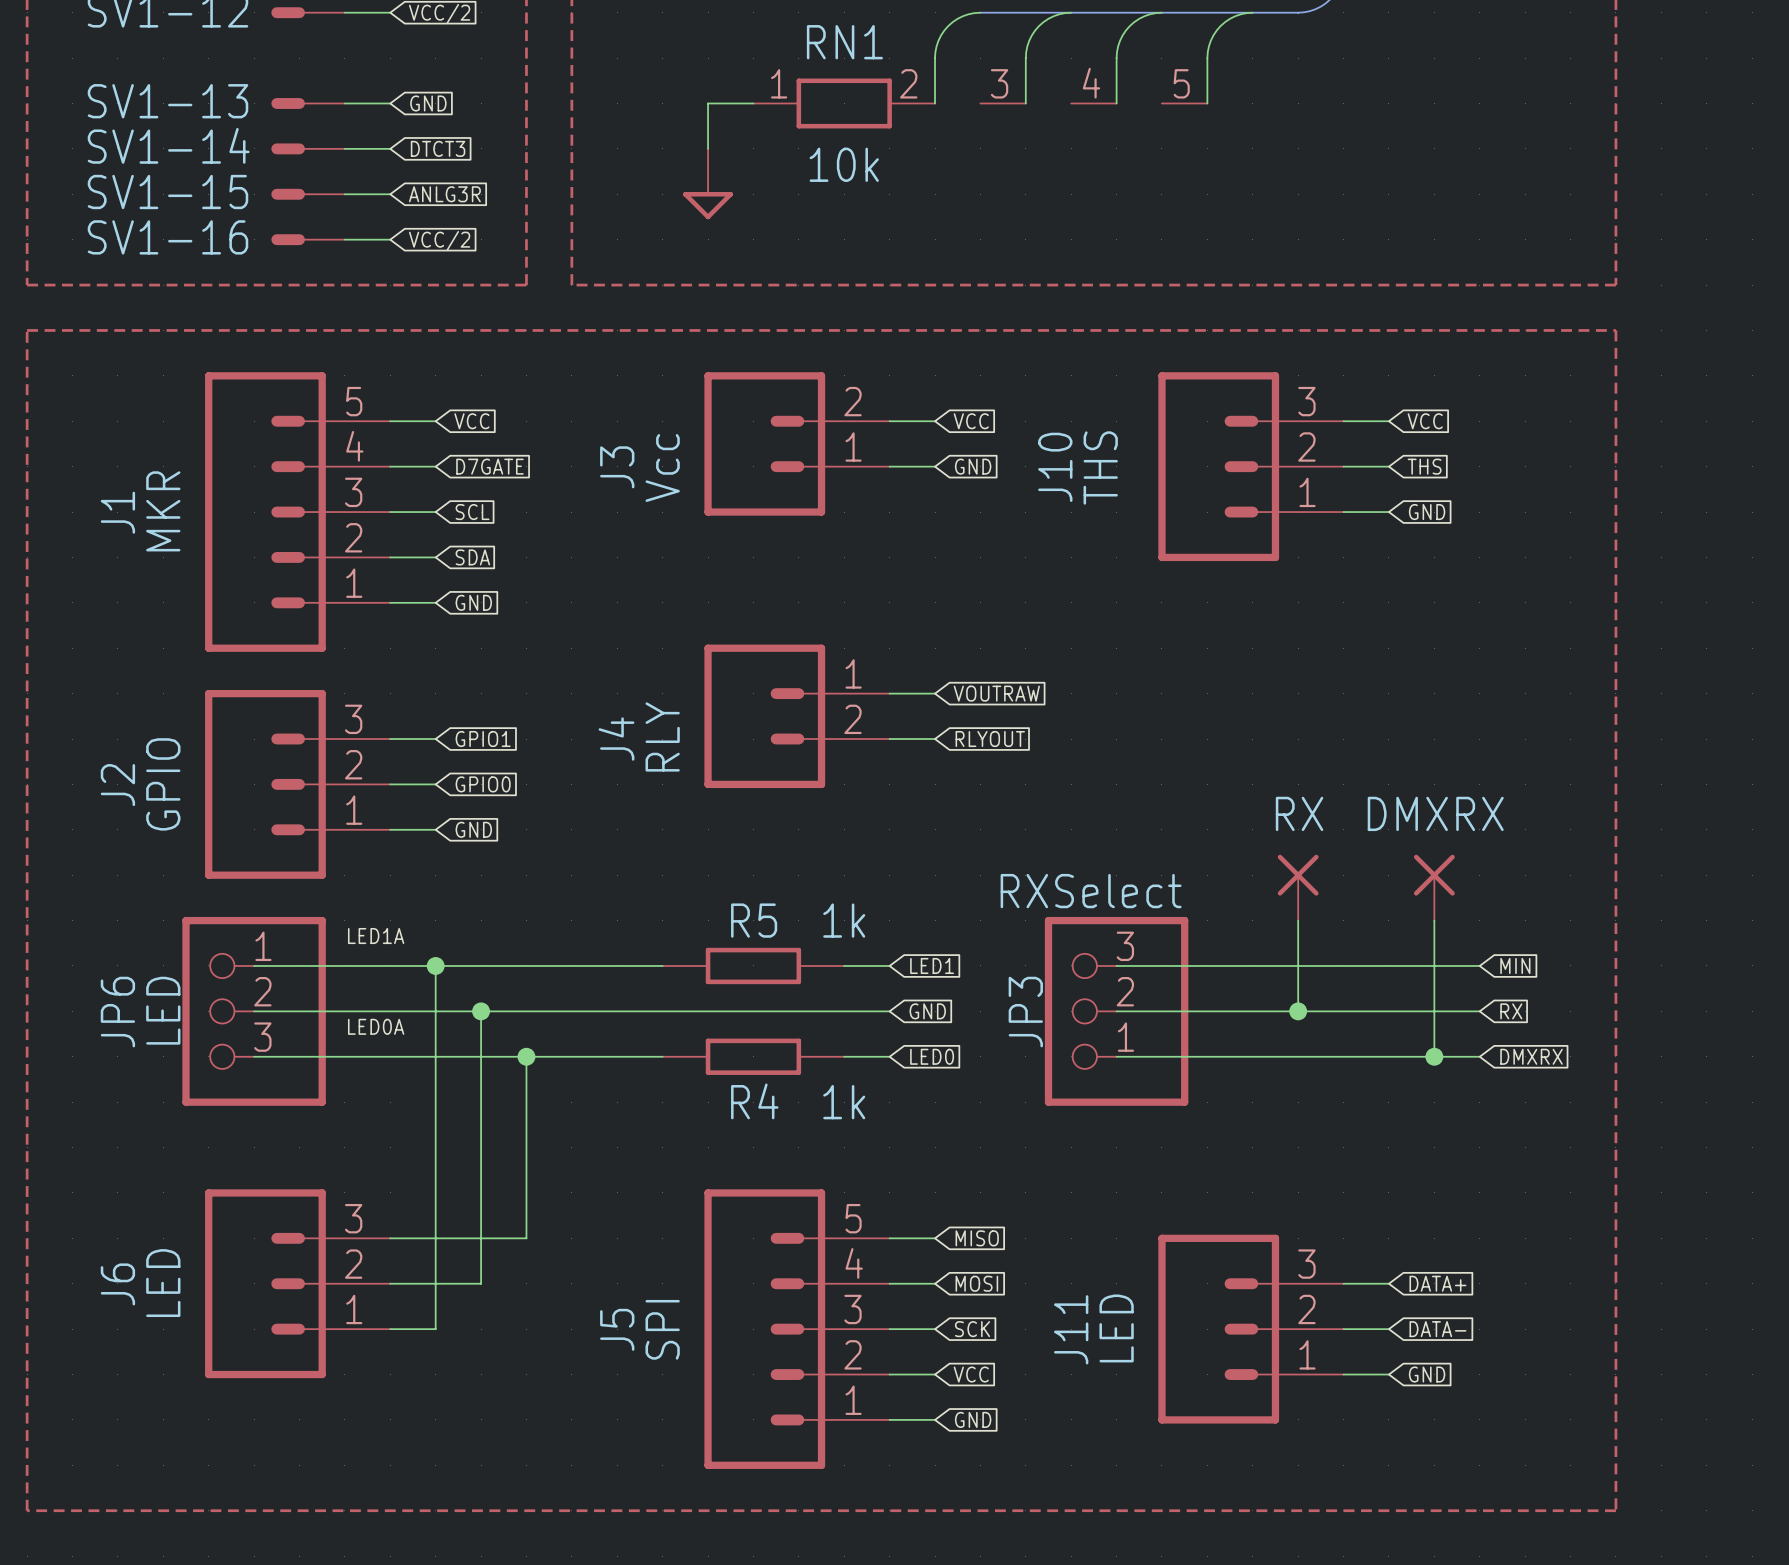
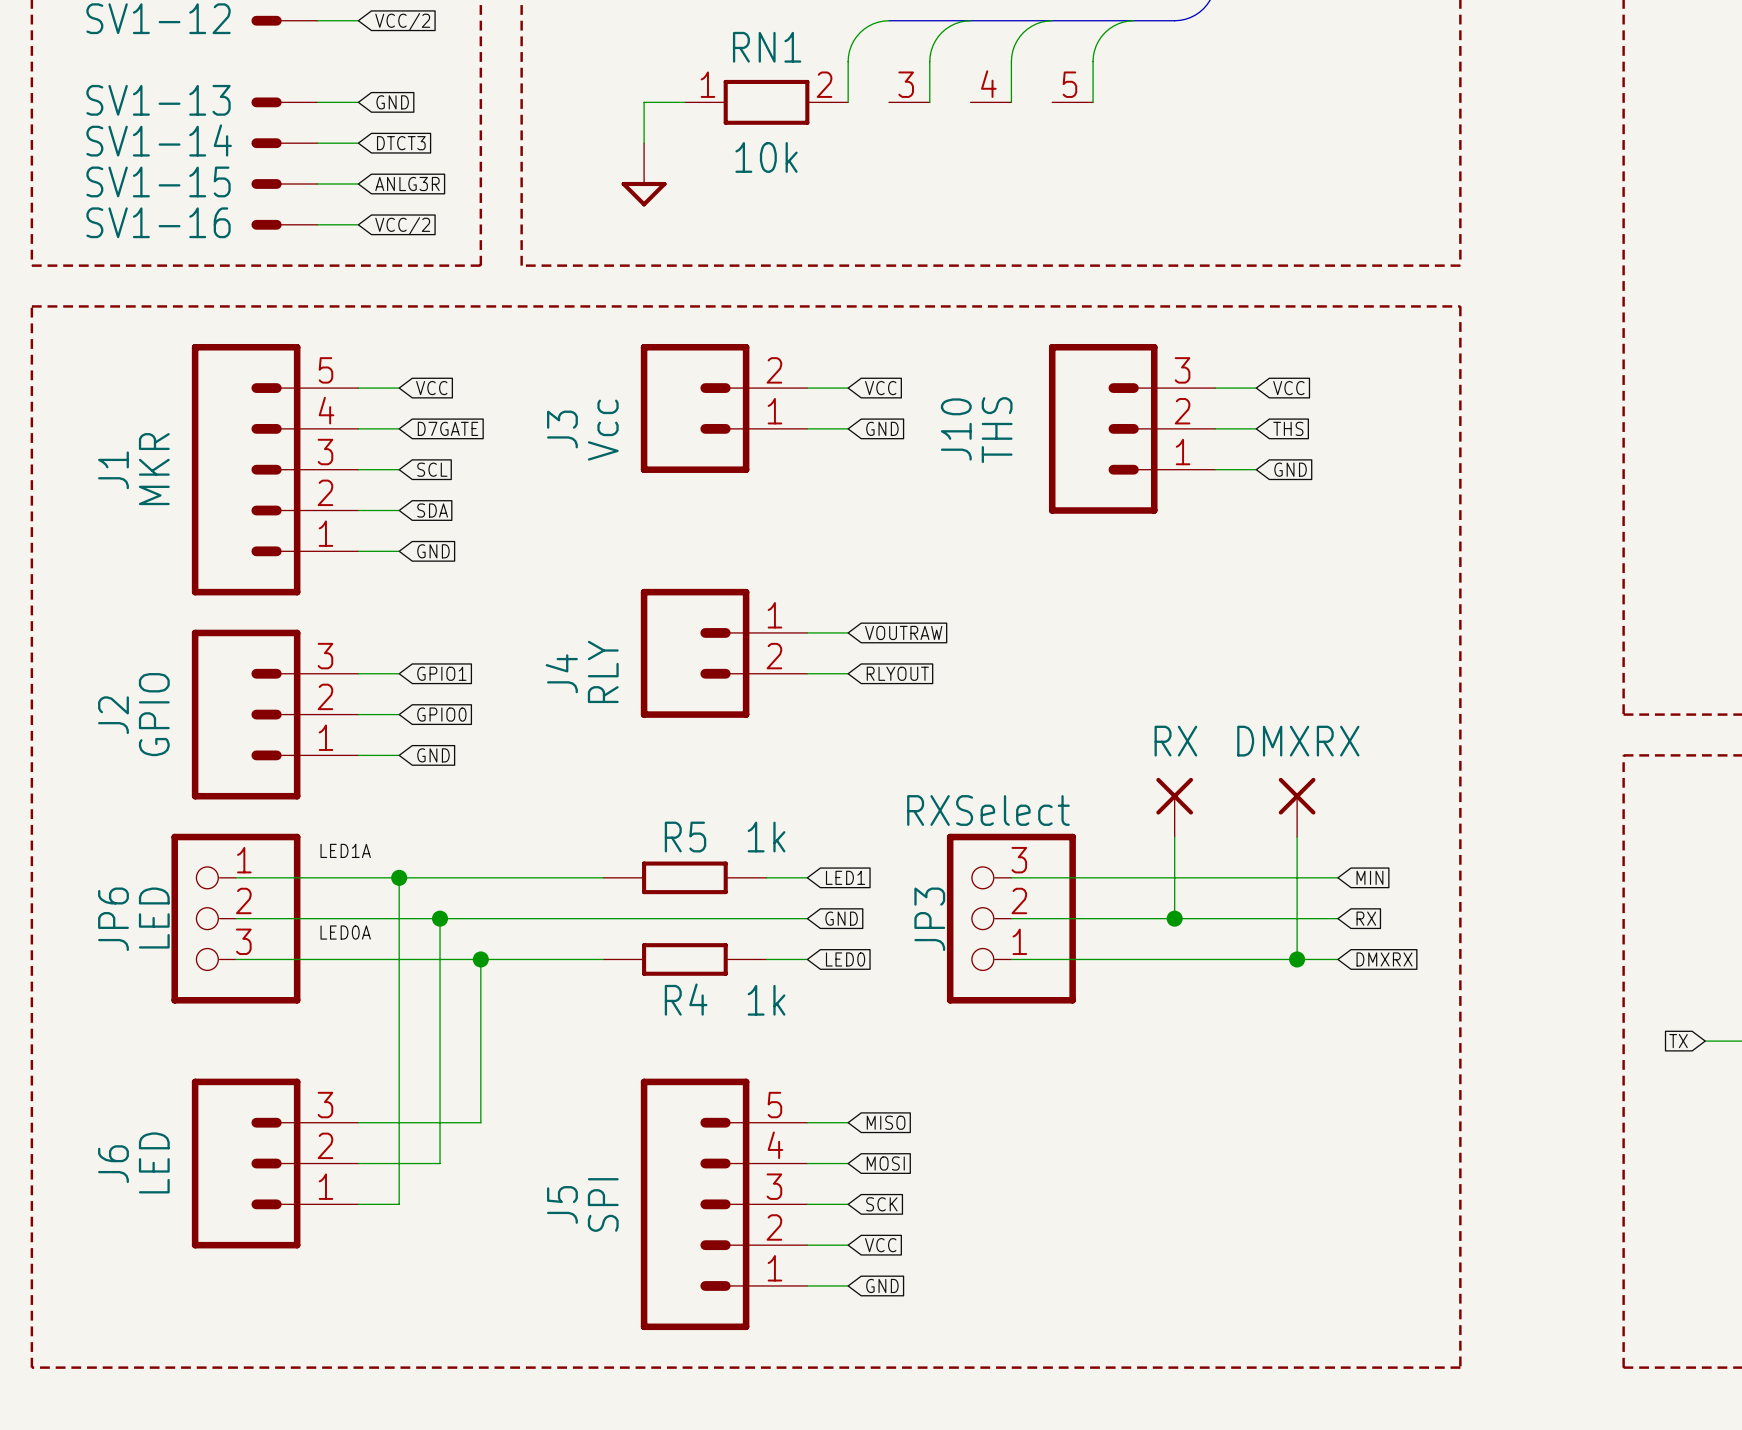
wire: (1343, 1283) (1388, 1283) -> none
global label: DATA+ (1437, 1283) -> none
J11: LED (1250, 1329) -> none
wire: (1343, 1329) (1388, 1329) -> none
global label: DATA- (1437, 1329) -> none
wire: (1343, 1374) (1388, 1374) -> none
global label: GND (1427, 1374) -> none

